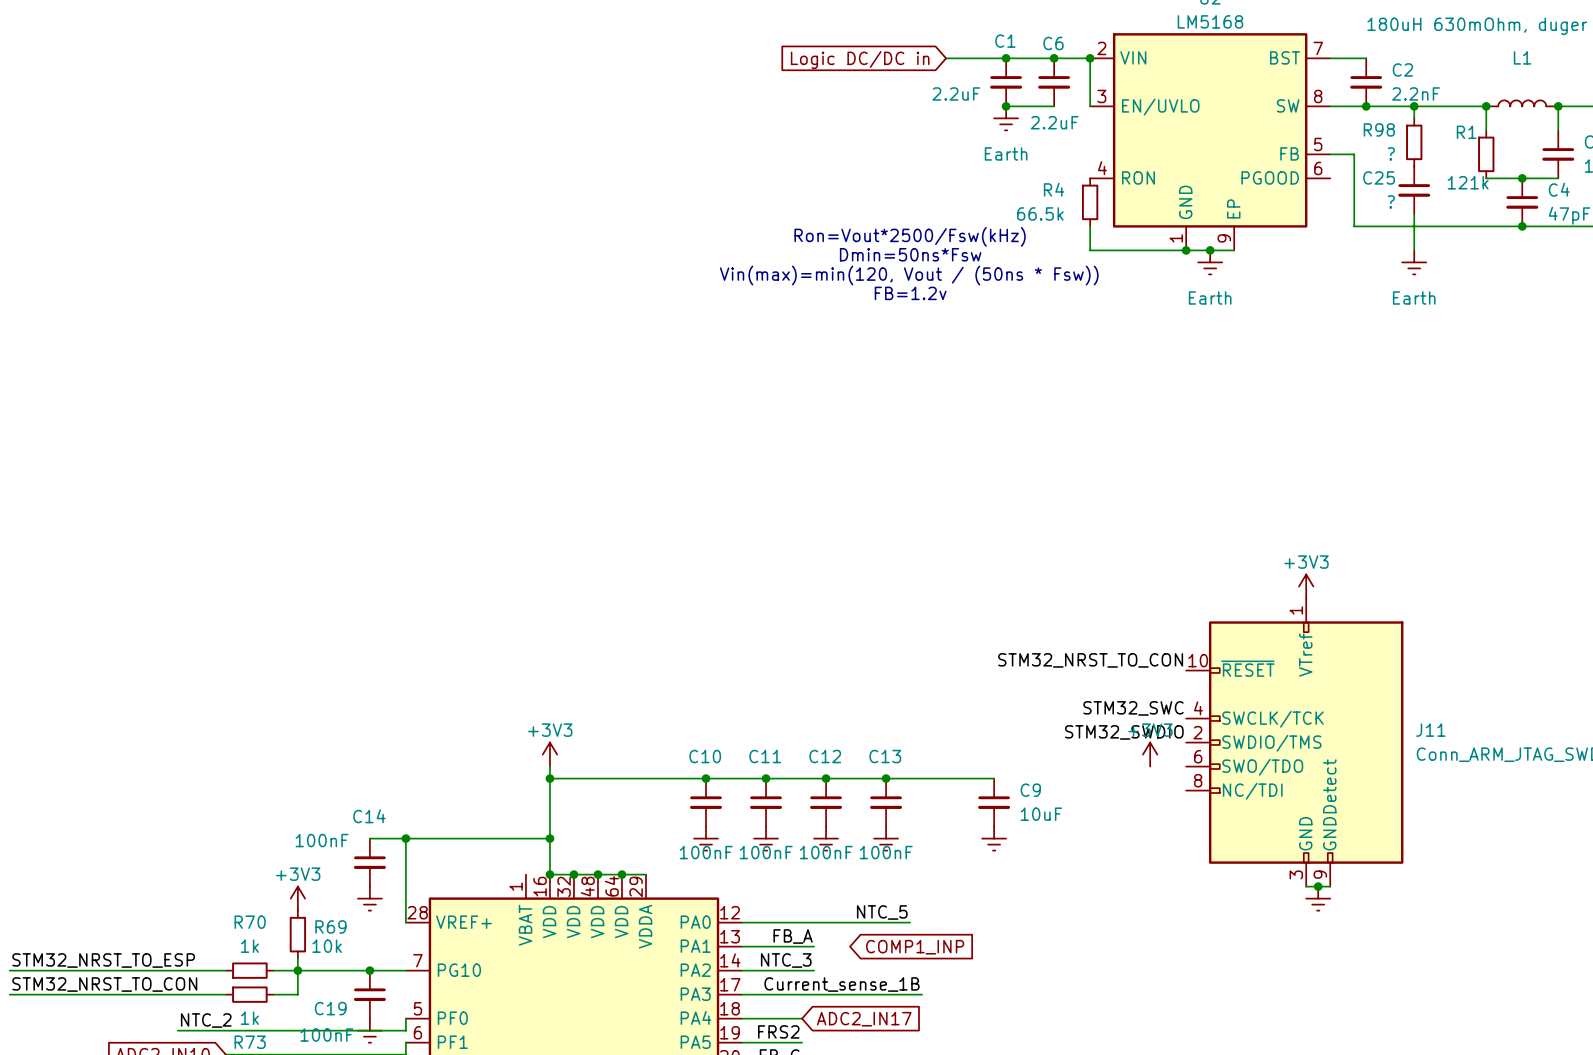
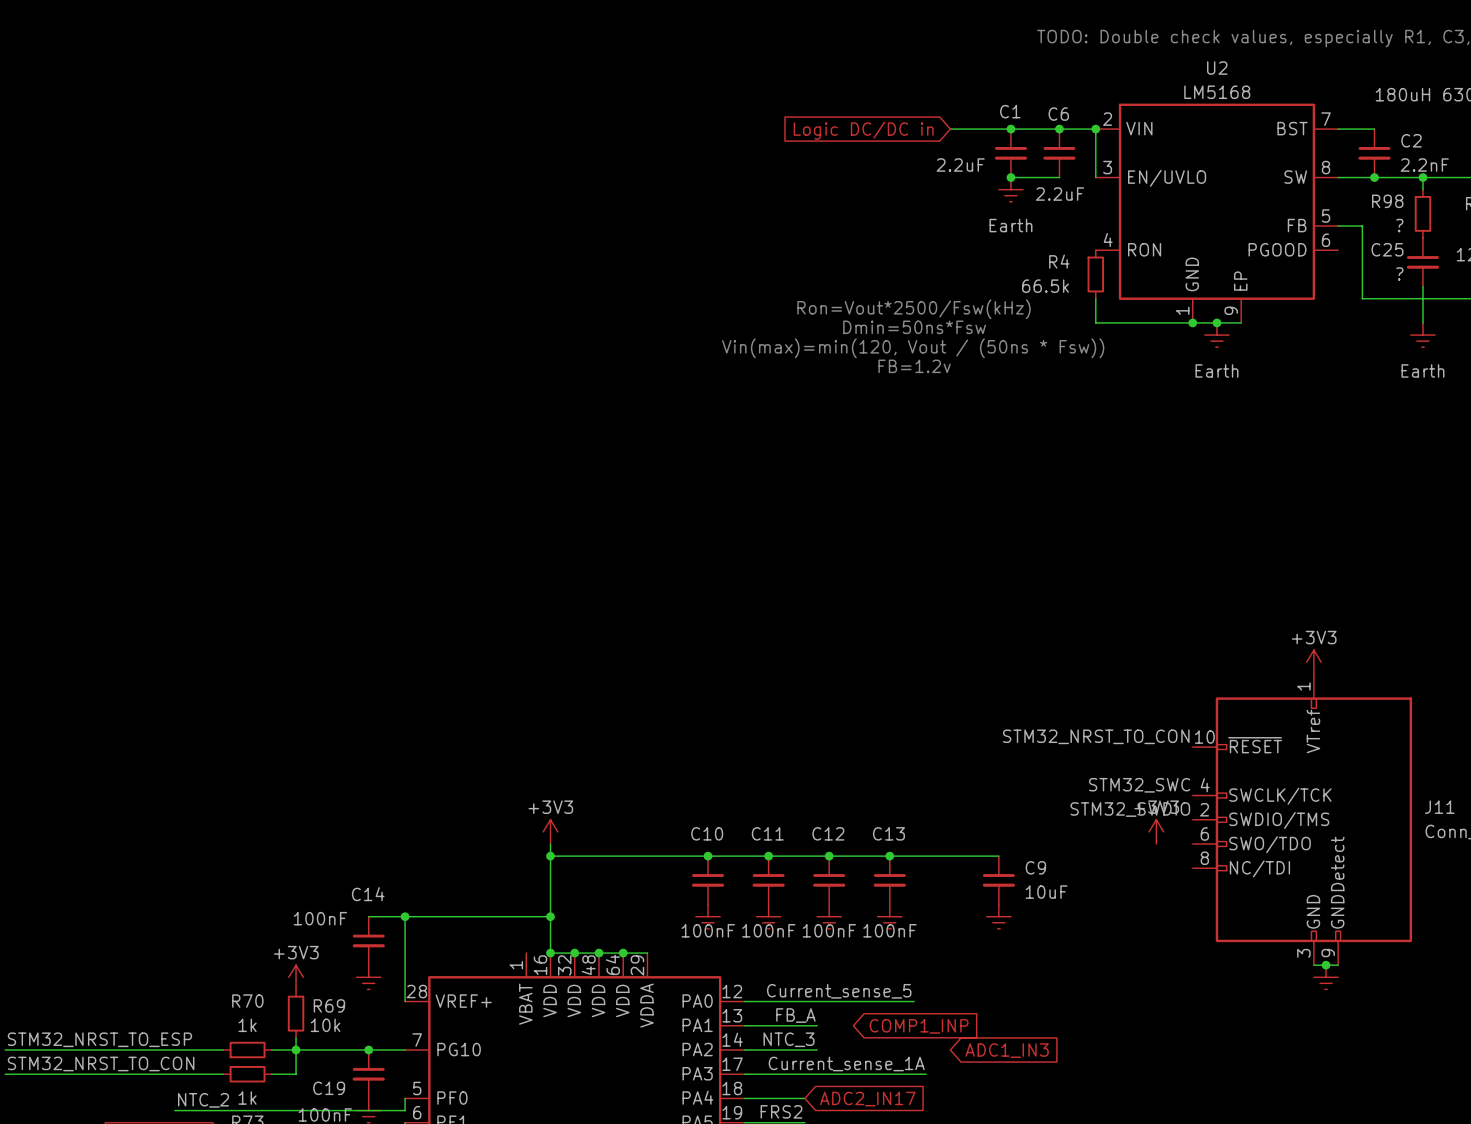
label: NTC_5 (882, 912) -> Current_sense_5 (839, 991)
global label: none -> ADC1_IN3 (1007, 1050)
label: Current_sense_1B (841, 984) -> Current_sense_1A (846, 1063)

